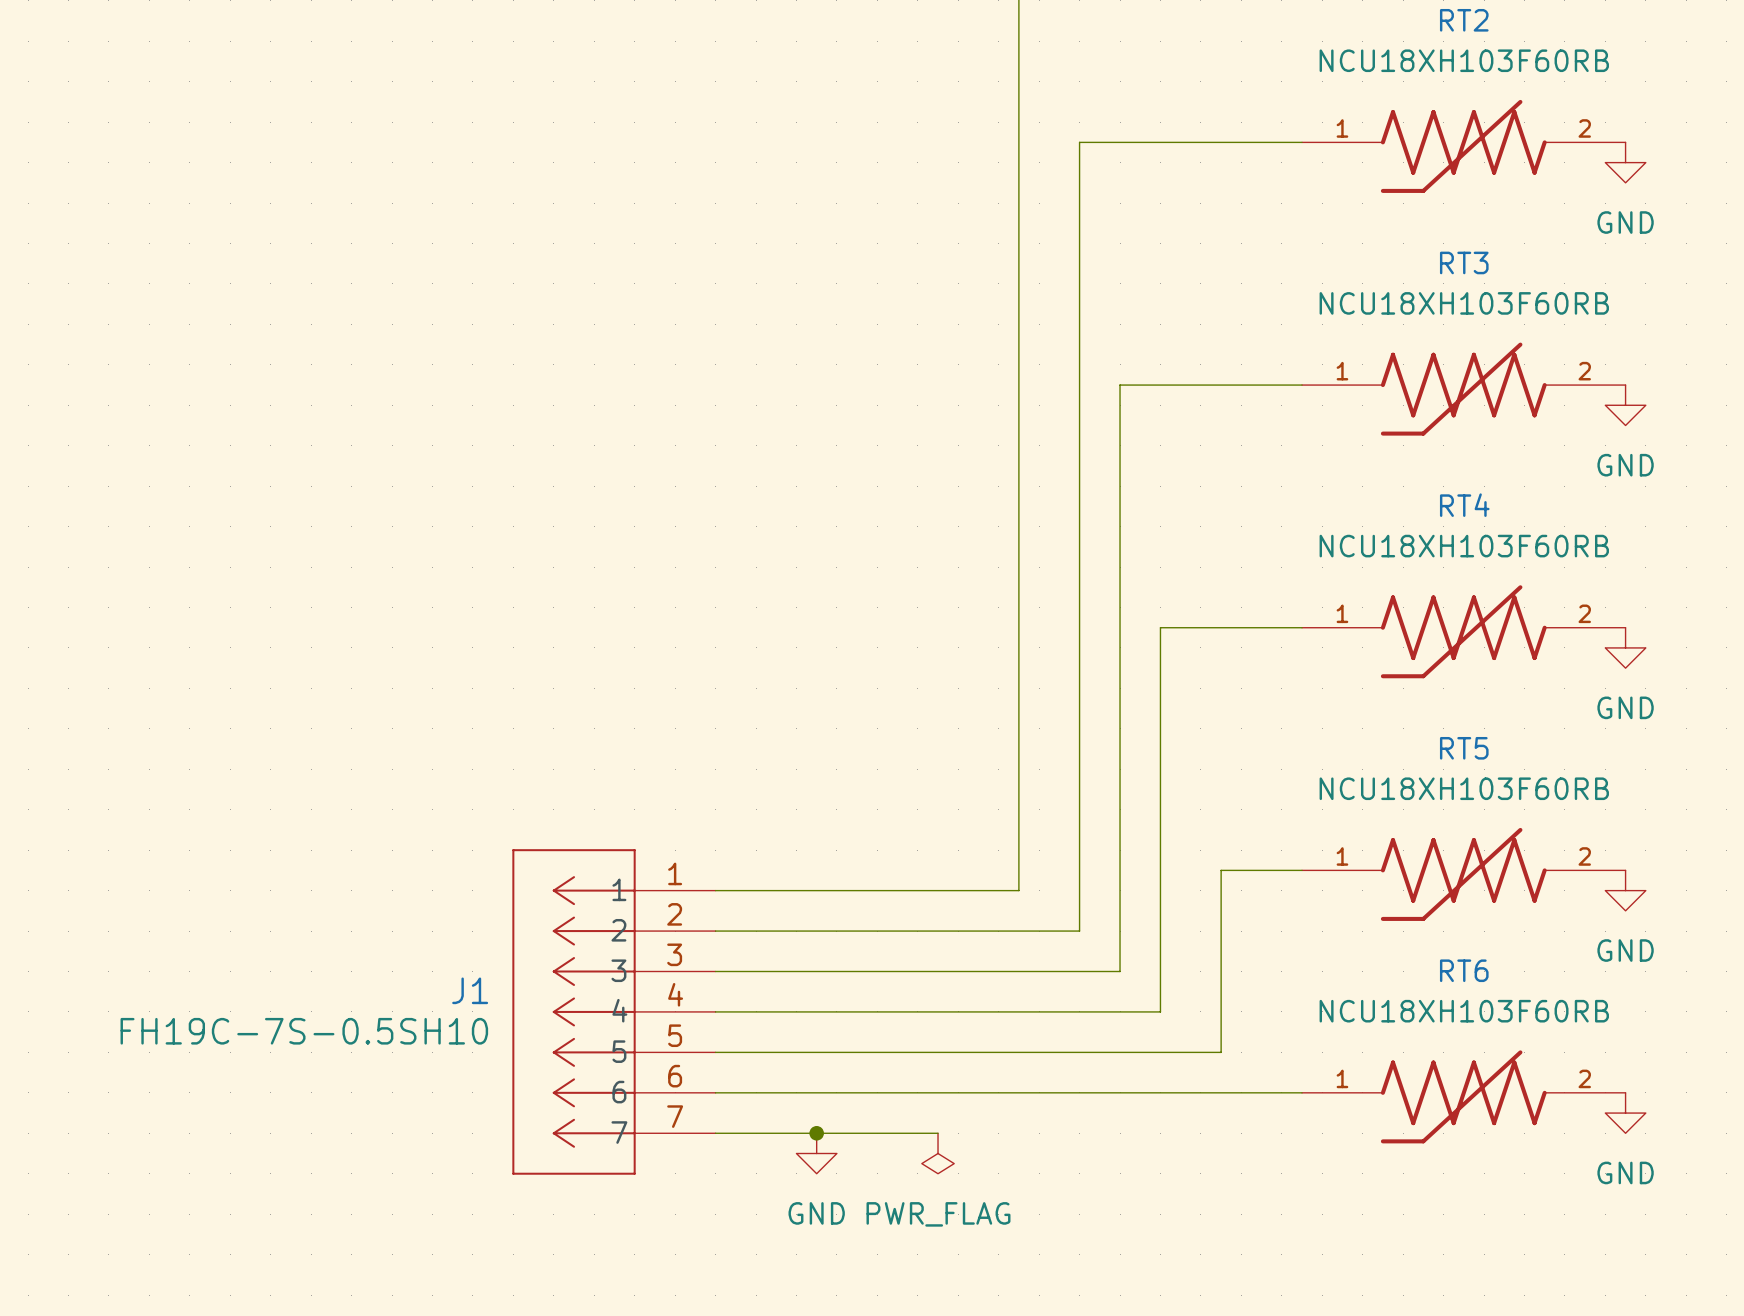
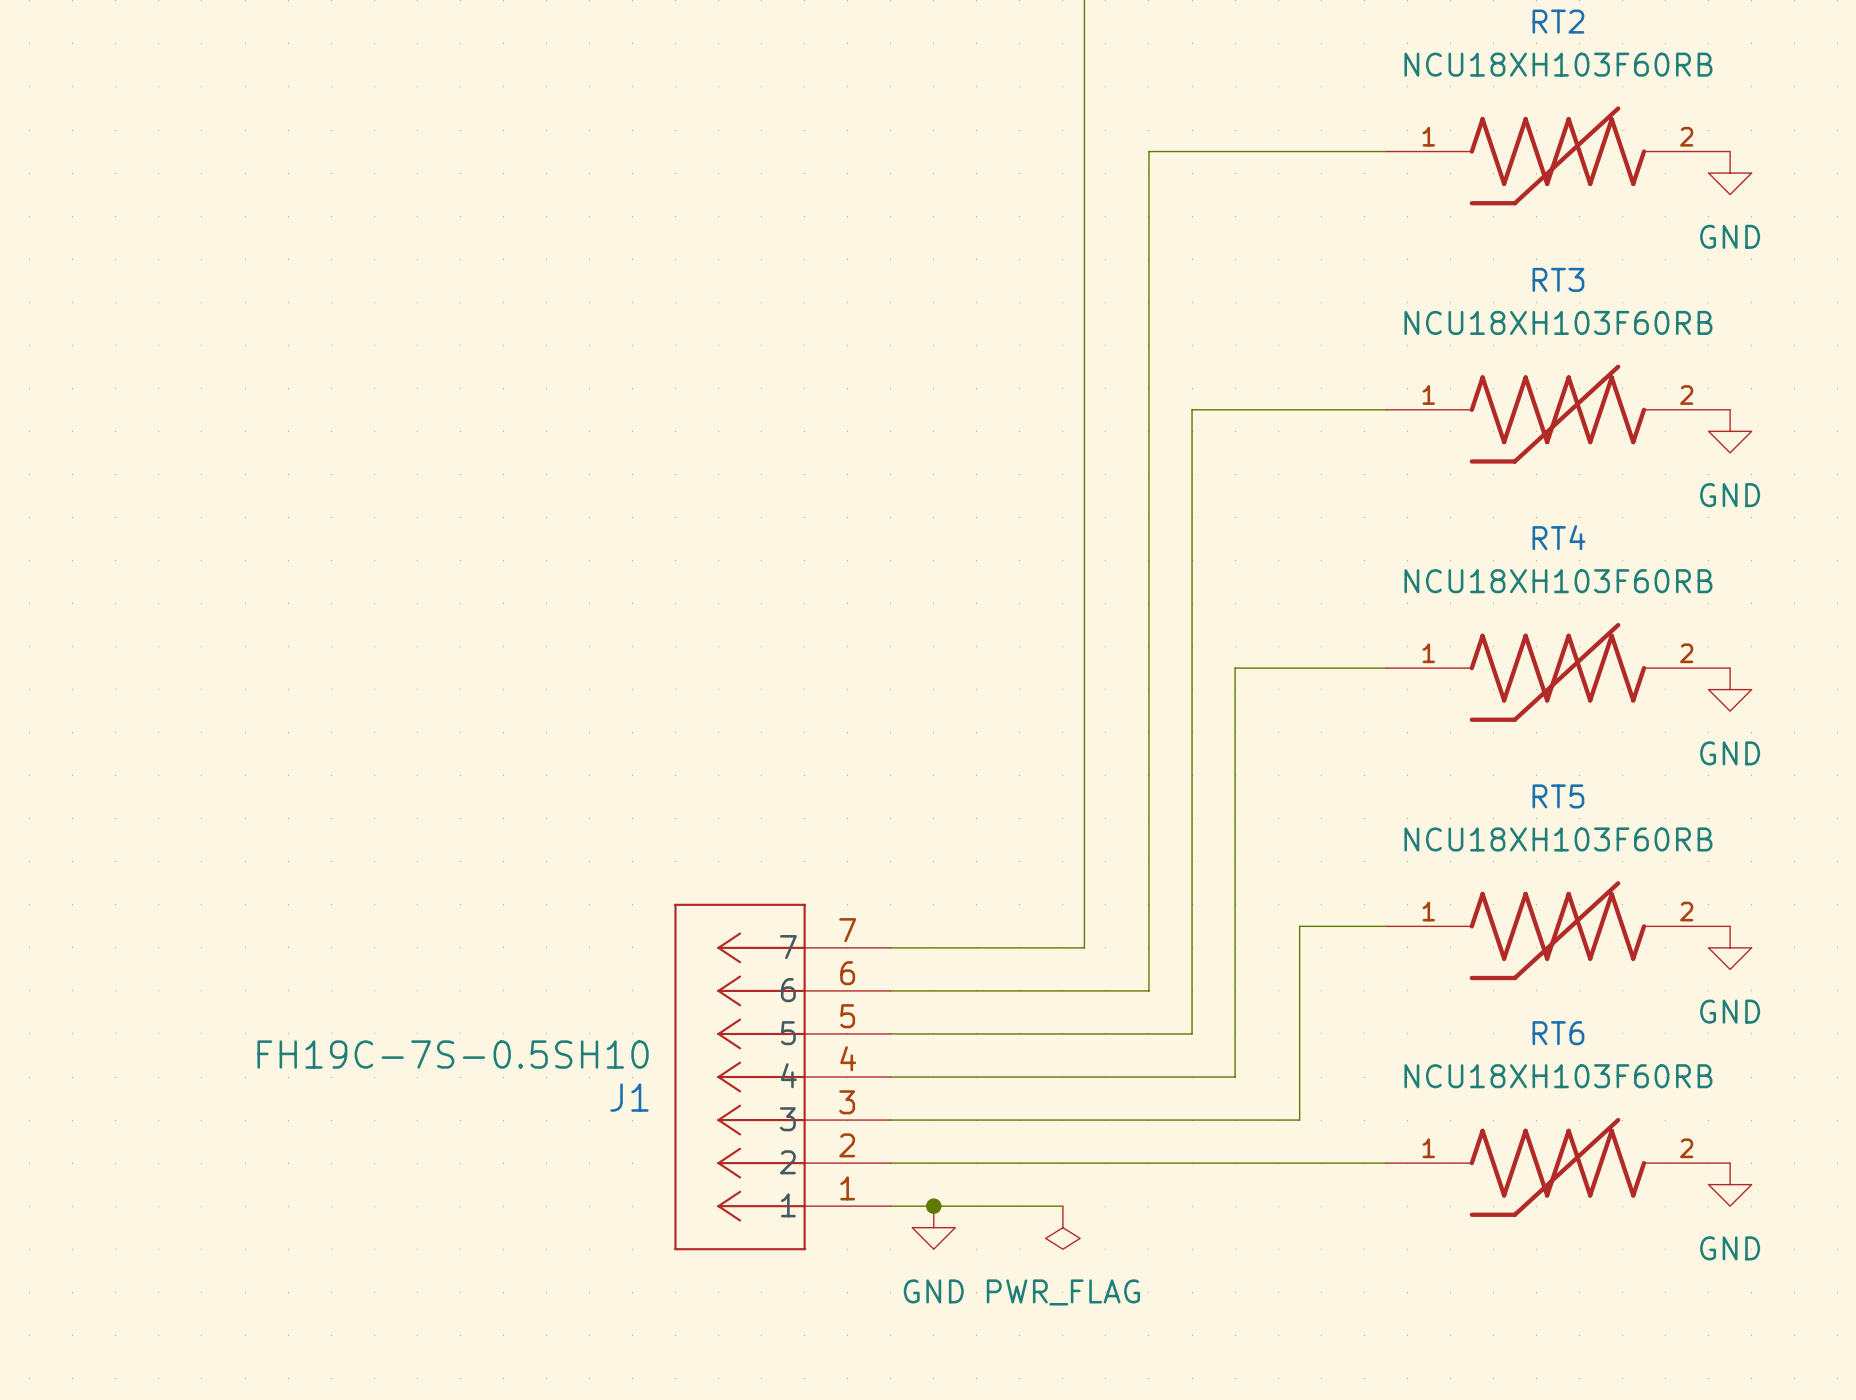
J1 flip: as is (574, 1011) -> up-down (740, 1077)
junction position: (816, 1133) -> (933, 1206)
wire: none -> (998, 1206) (1062, 1206)
power symbol position: GND (816, 1153) -> GND (933, 1227)
power symbol position: PWR_FLAG (938, 1153) -> PWR_FLAG (1062, 1227)

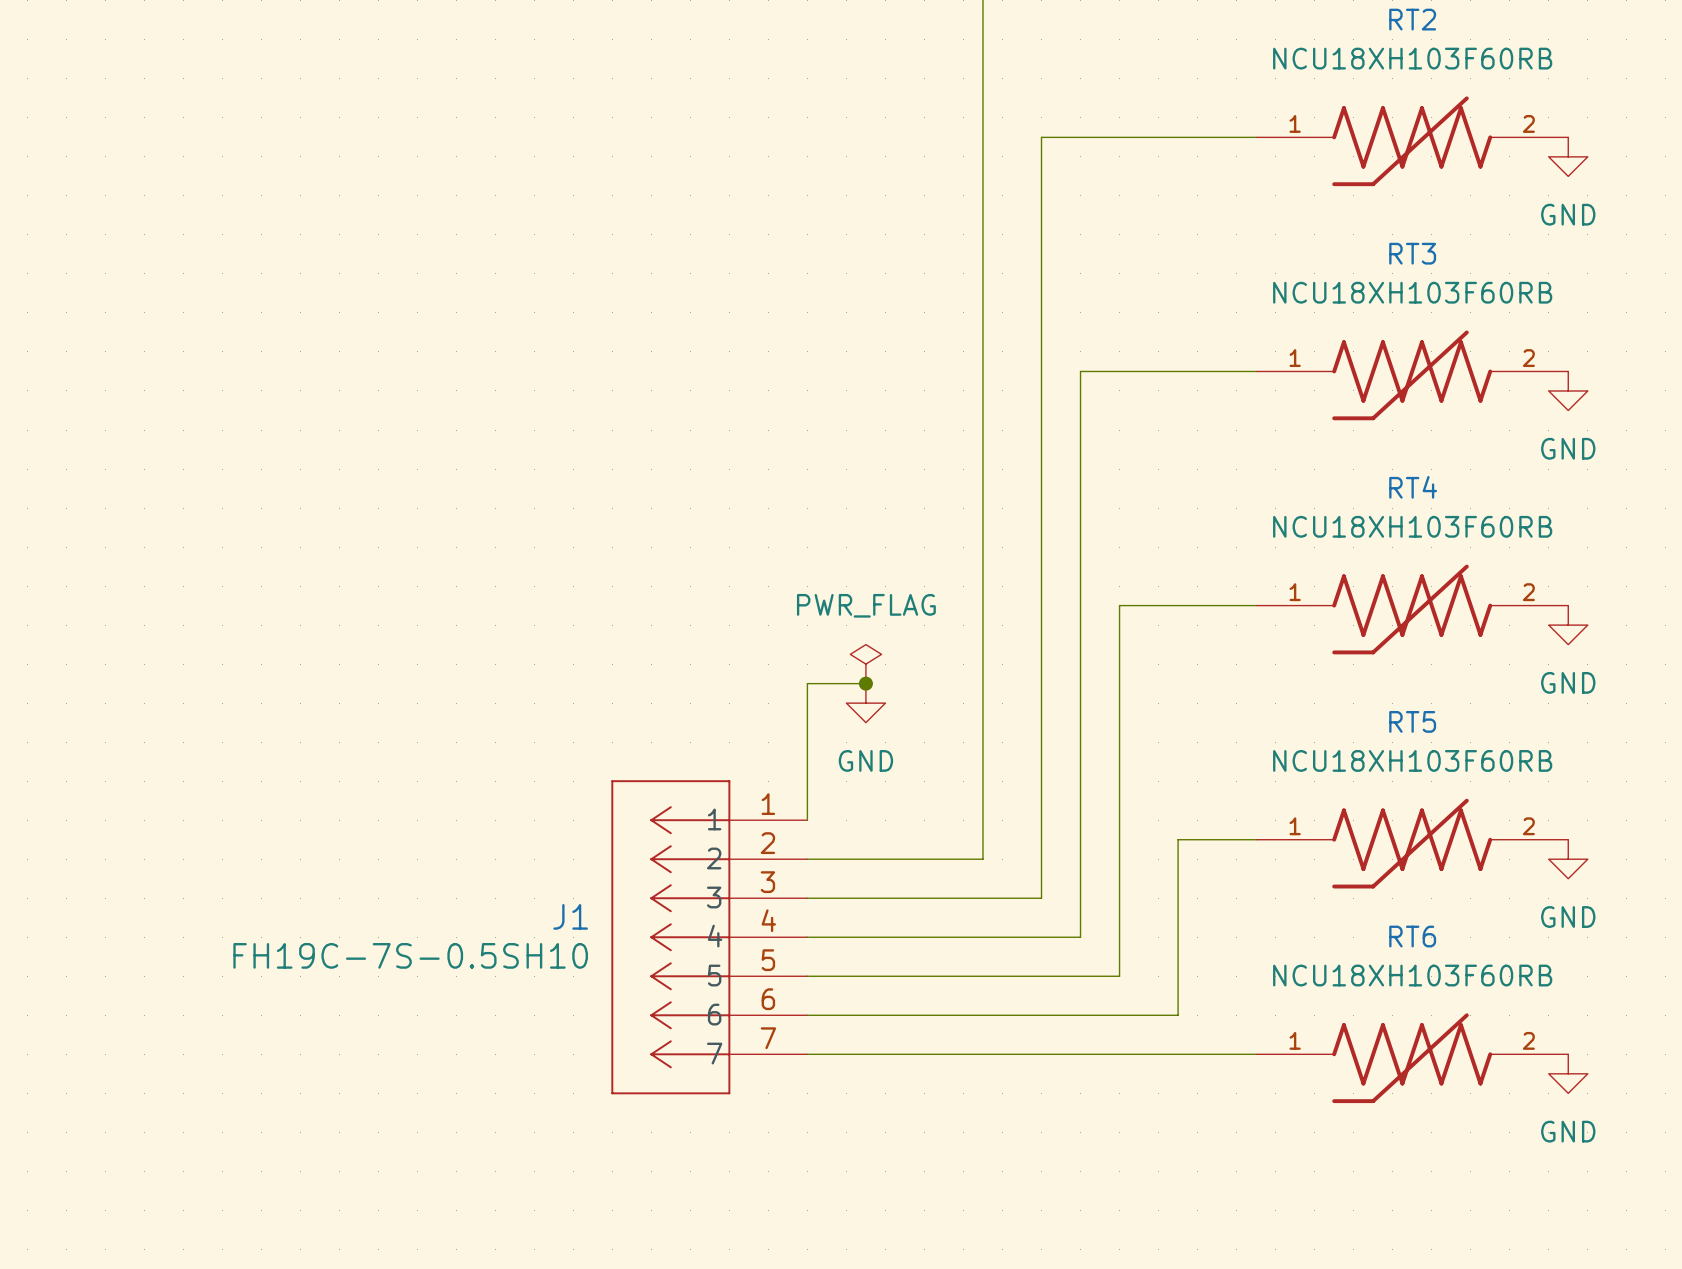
power symbol: none -> PWR_FLAG (865, 664)
wire: none -> (865, 683) (807, 683) (807, 820)
junction: none -> (865, 683)
power symbol: none -> GND (865, 703)
J1 flip: as is (740, 1077) -> up-down (670, 937)
wire: (890, 1206) (1062, 1206) -> none
junction: (933, 1206) -> none
power symbol: GND (933, 1227) -> none
power symbol: PWR_FLAG (1062, 1227) -> none

